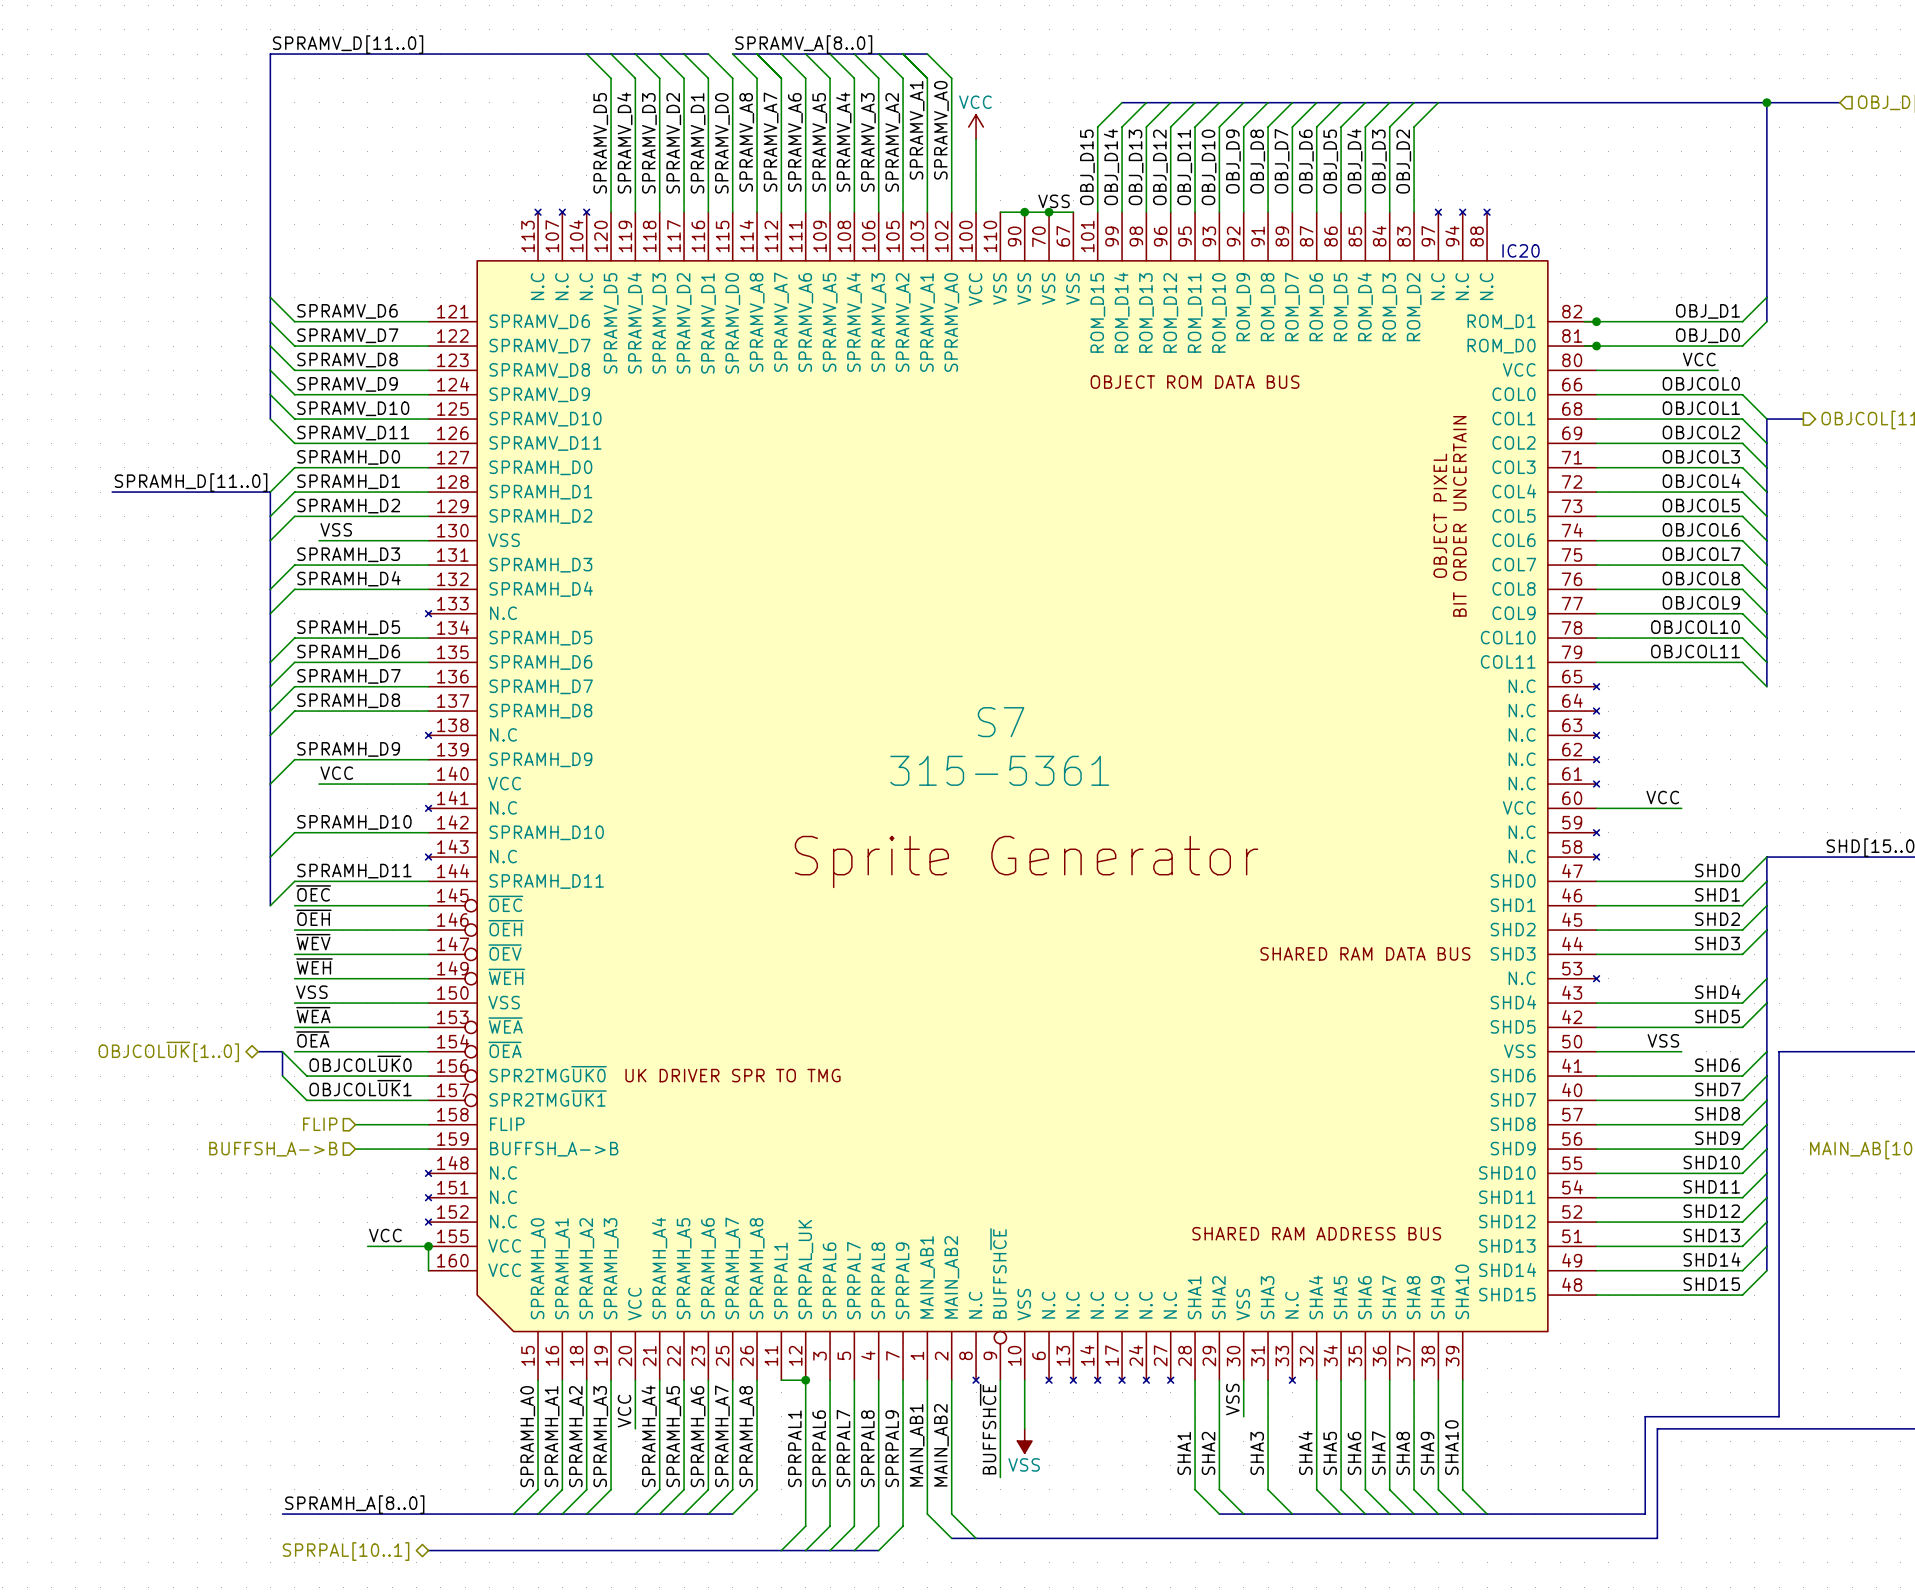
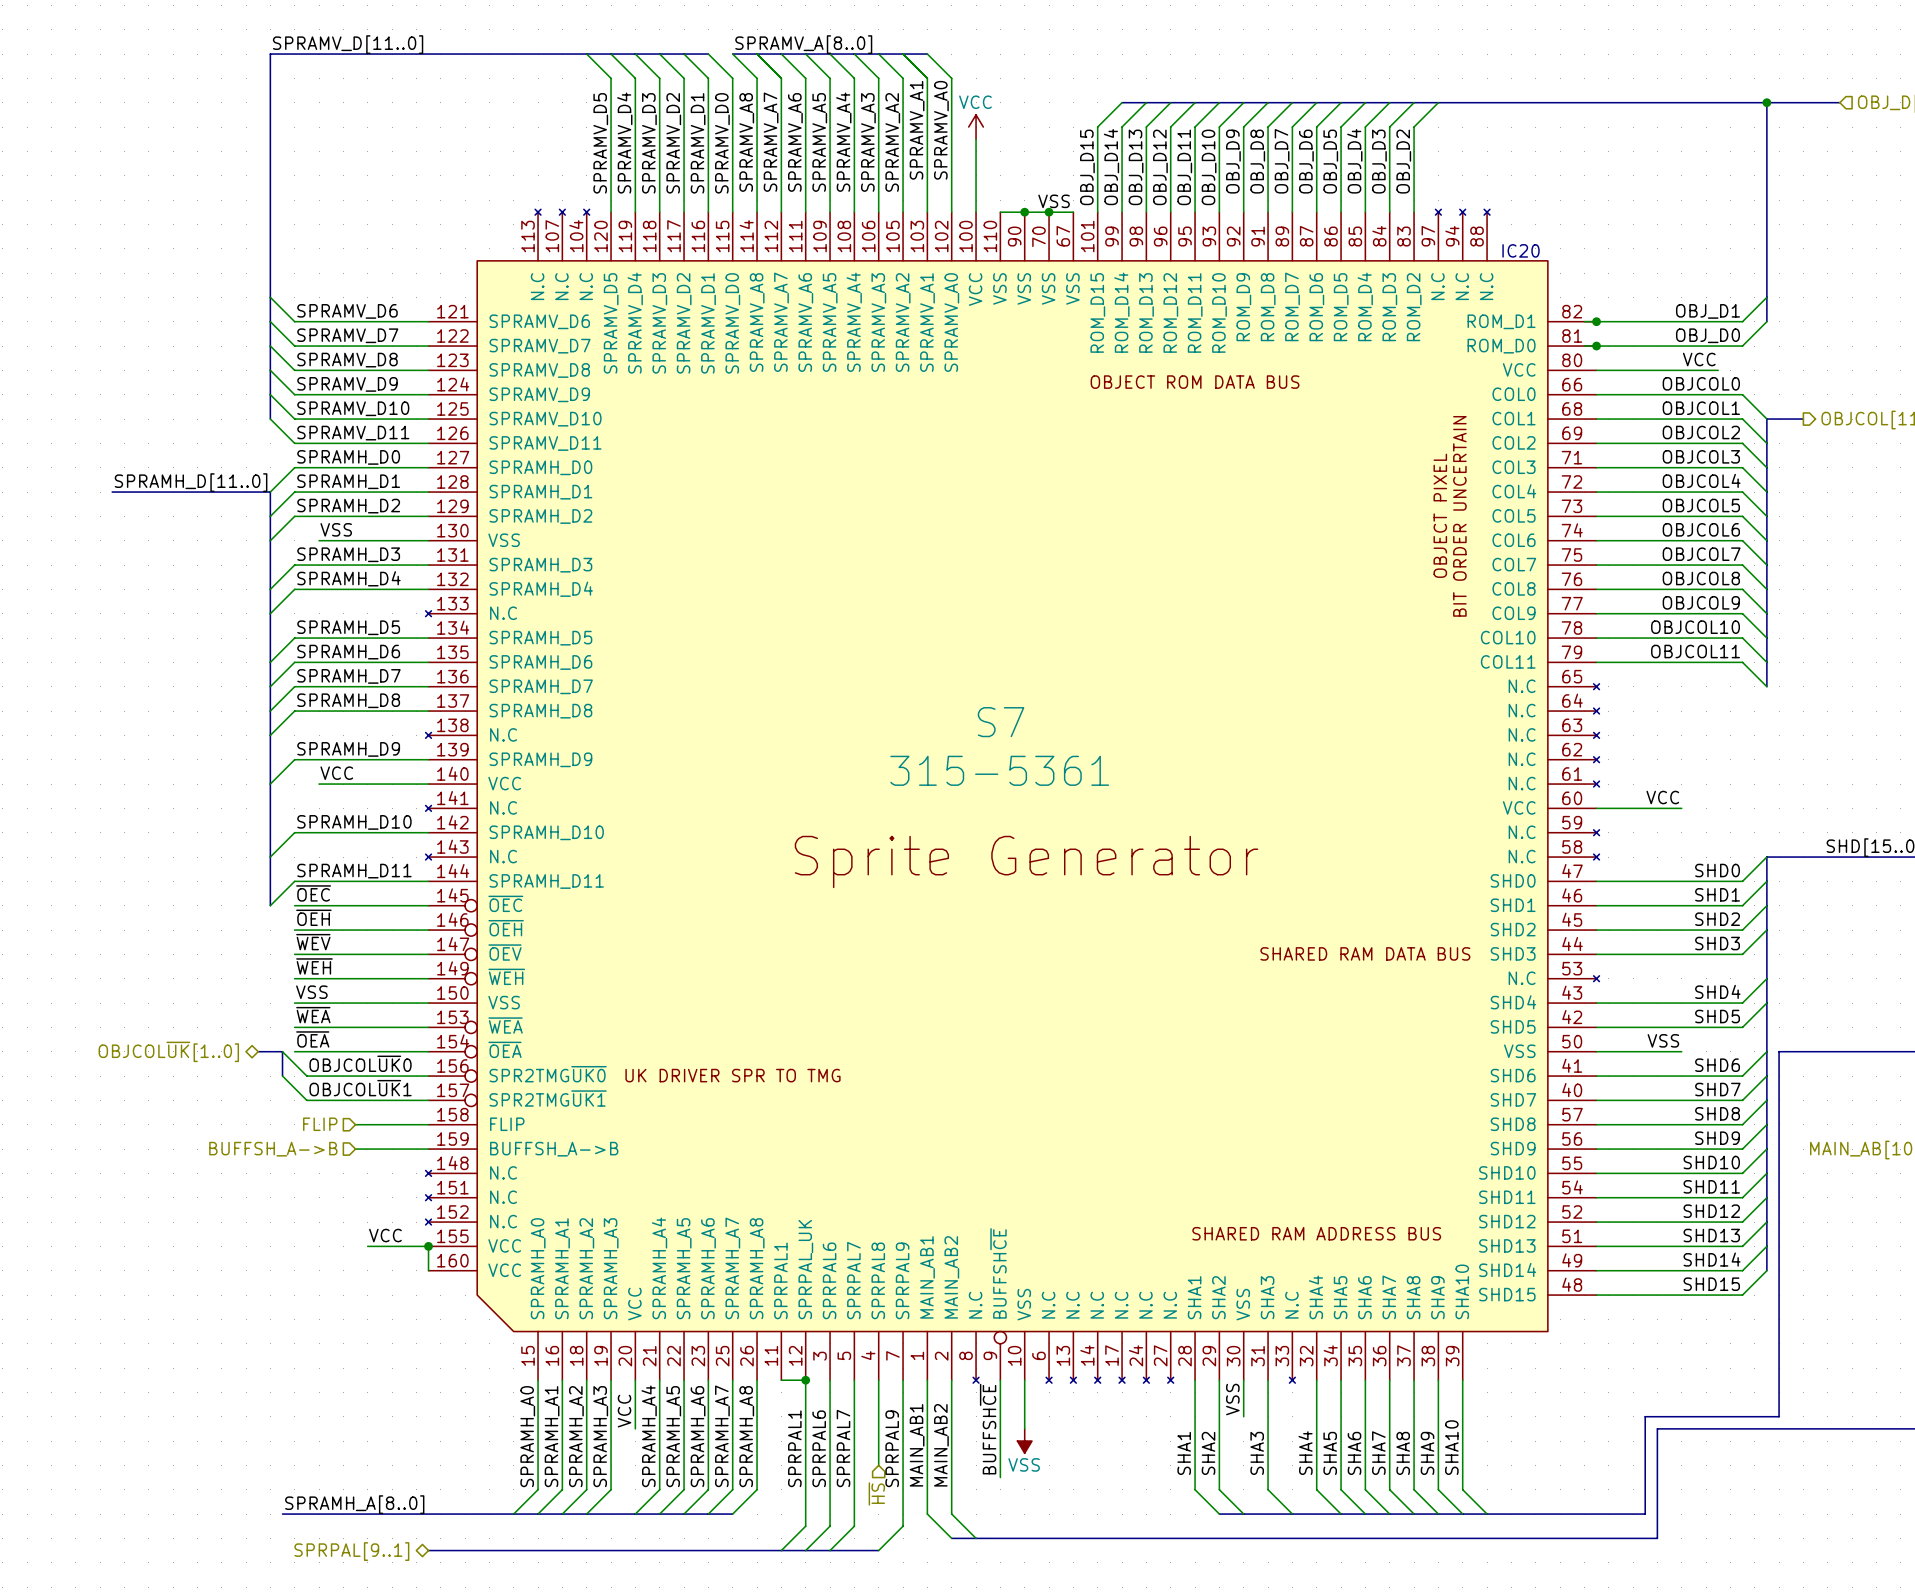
label: SPRPAL8 (867, 1448) -> none
wire: (878, 1465) (878, 1526) (854, 1550) -> none
hierarchical label: none -> ~{HS} (876, 1493)
hierarchical label: SPRPAL[10..1] (346, 1551) -> SPRPAL[9..1] (351, 1551)

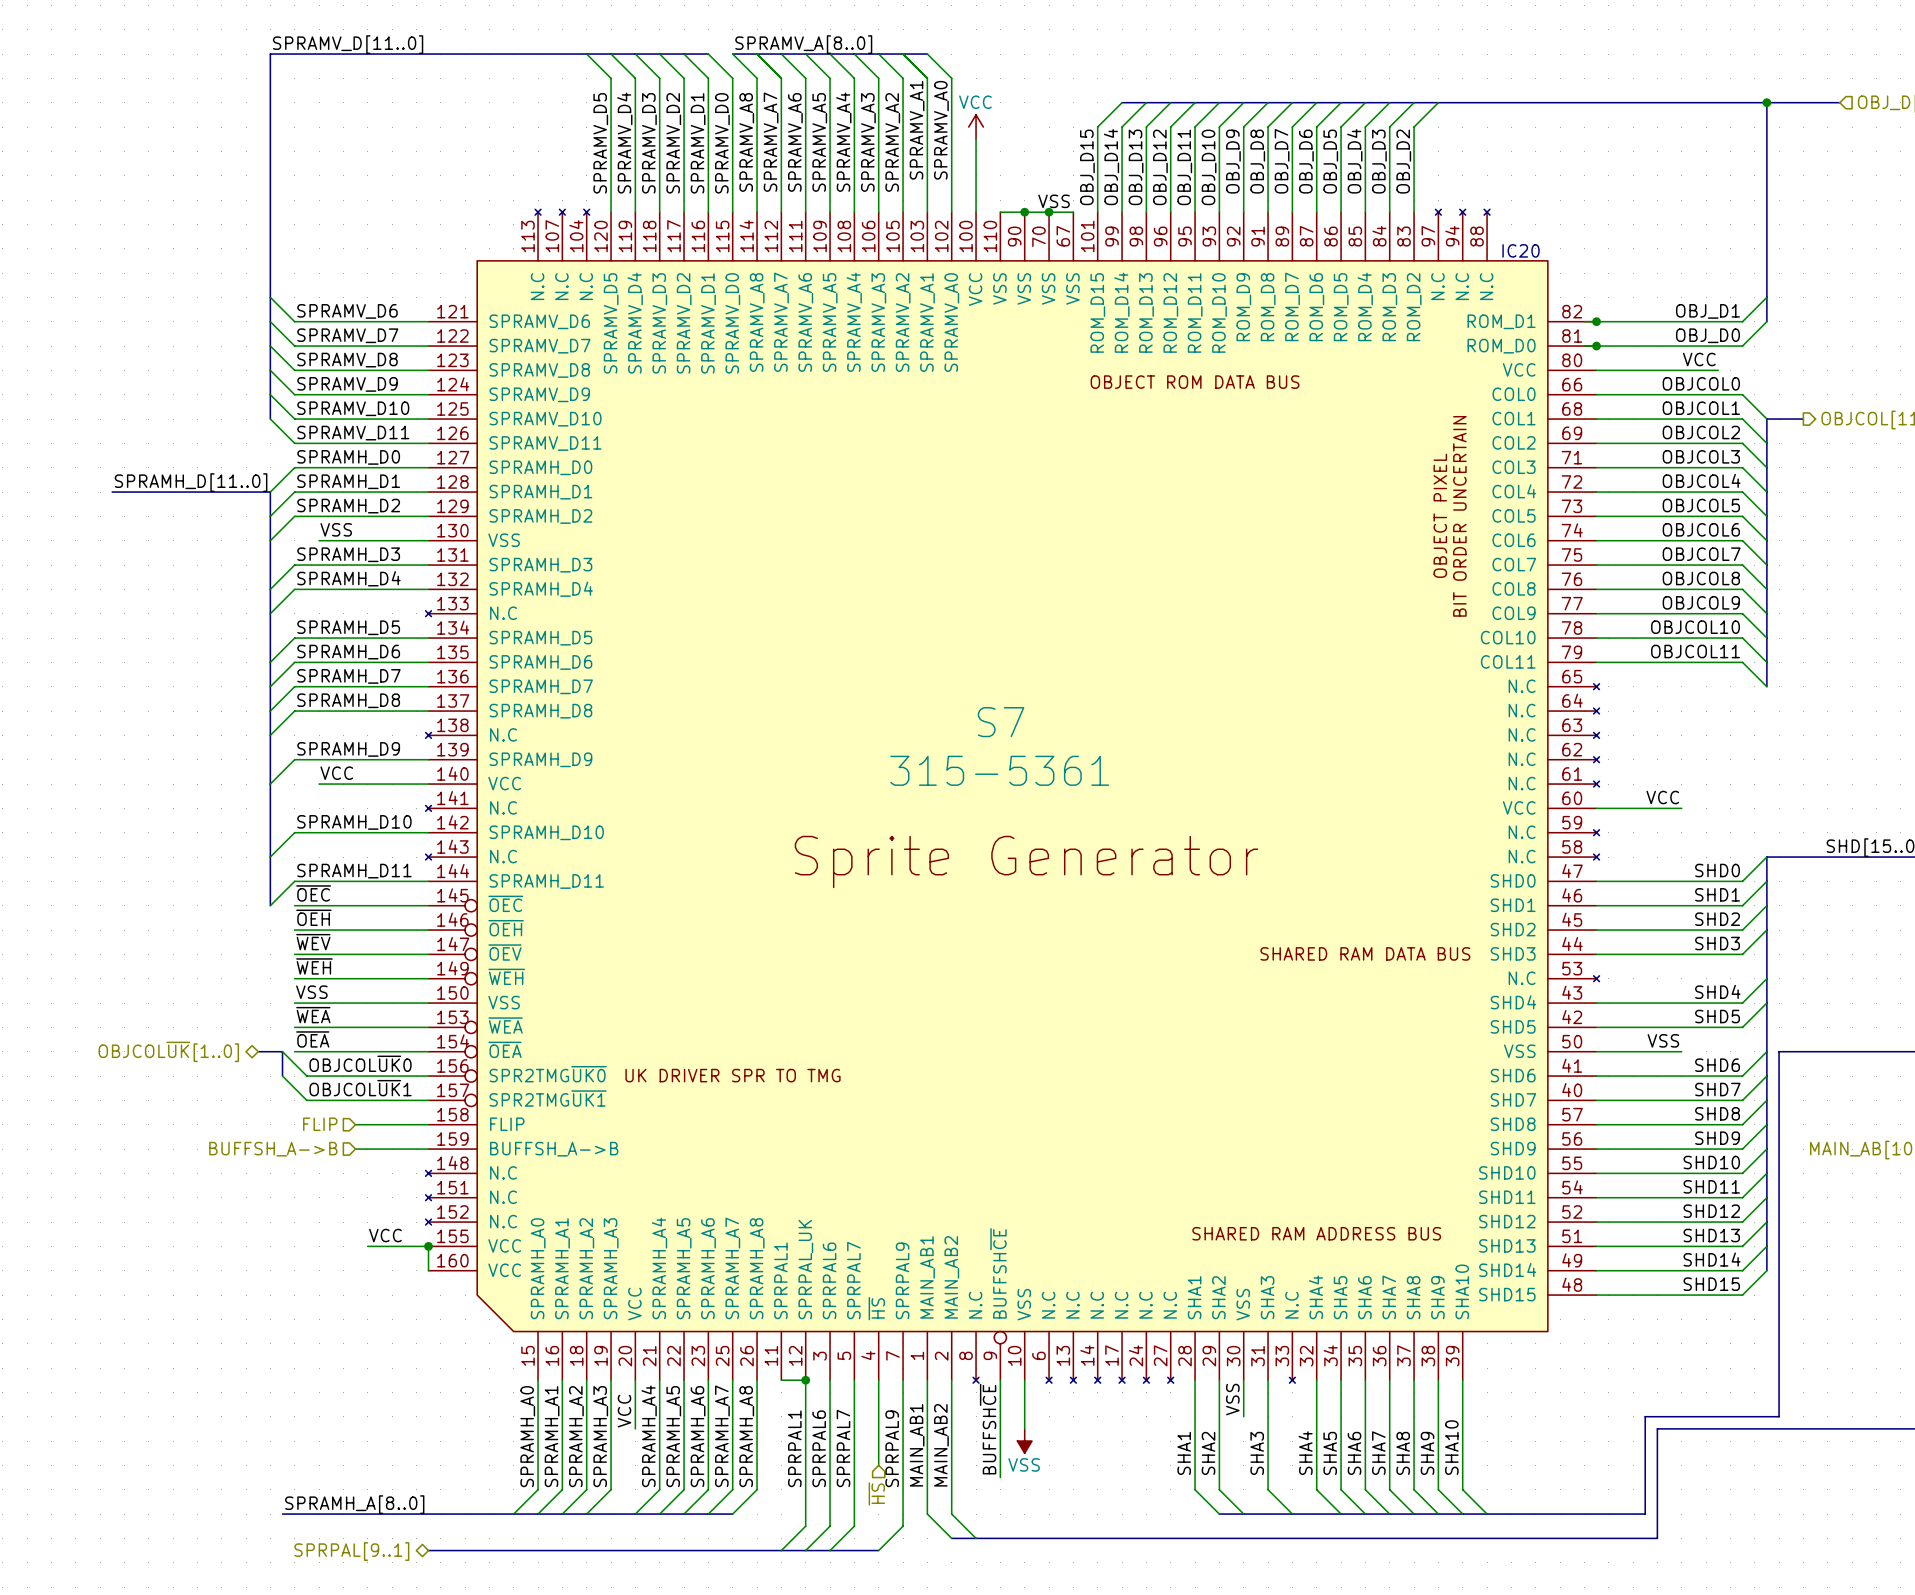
S7 pin name: SPRPAL8 (878, 1280) -> ~{HS} (876, 1308)

